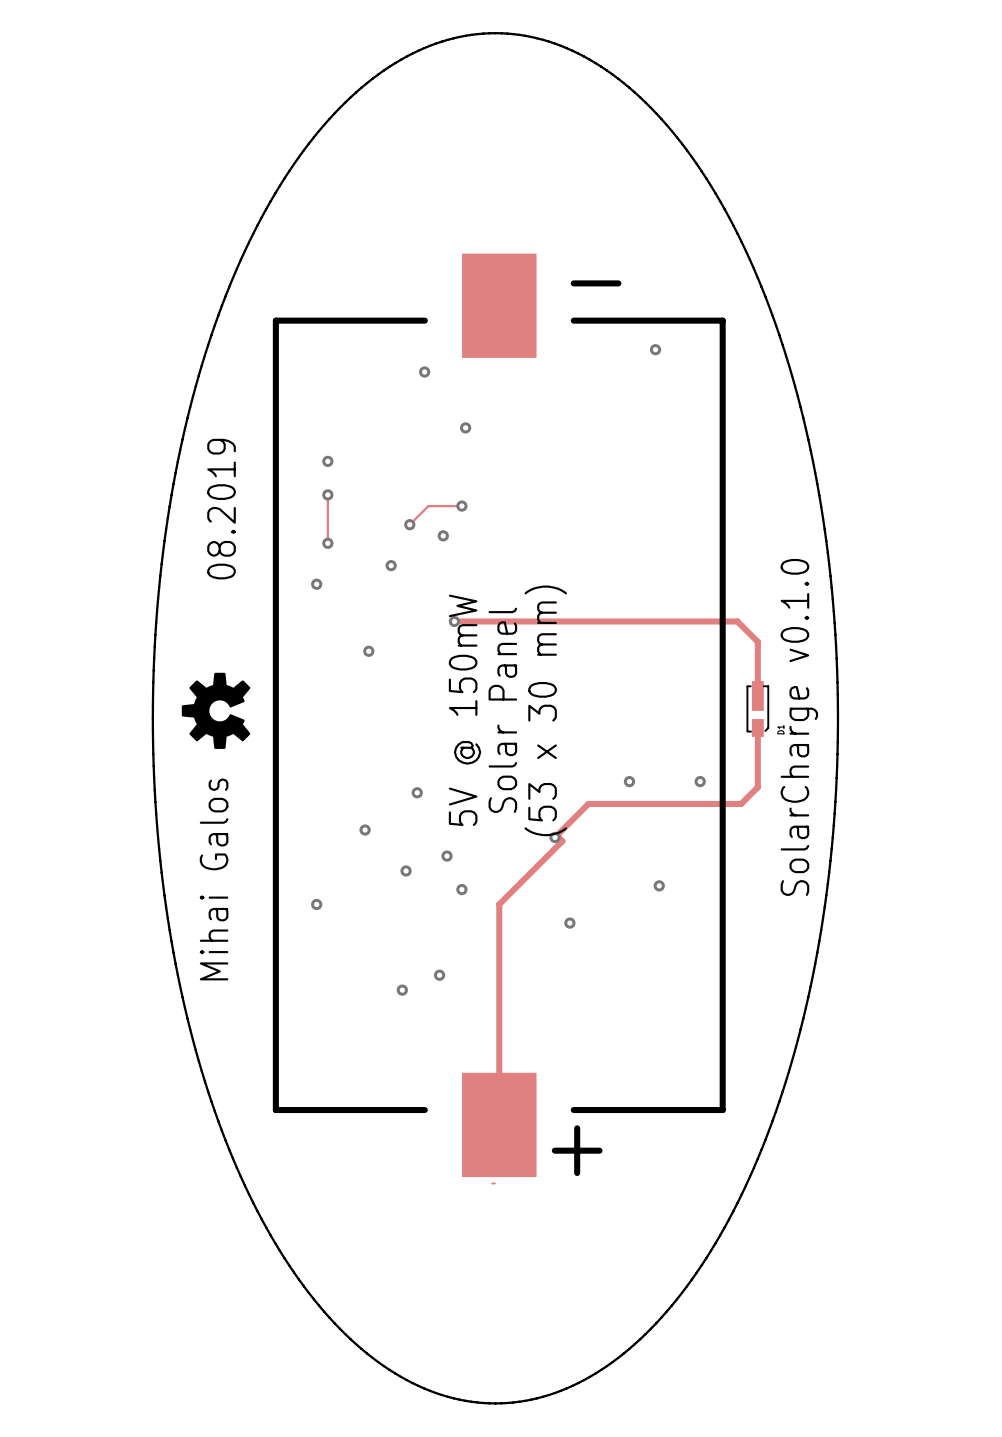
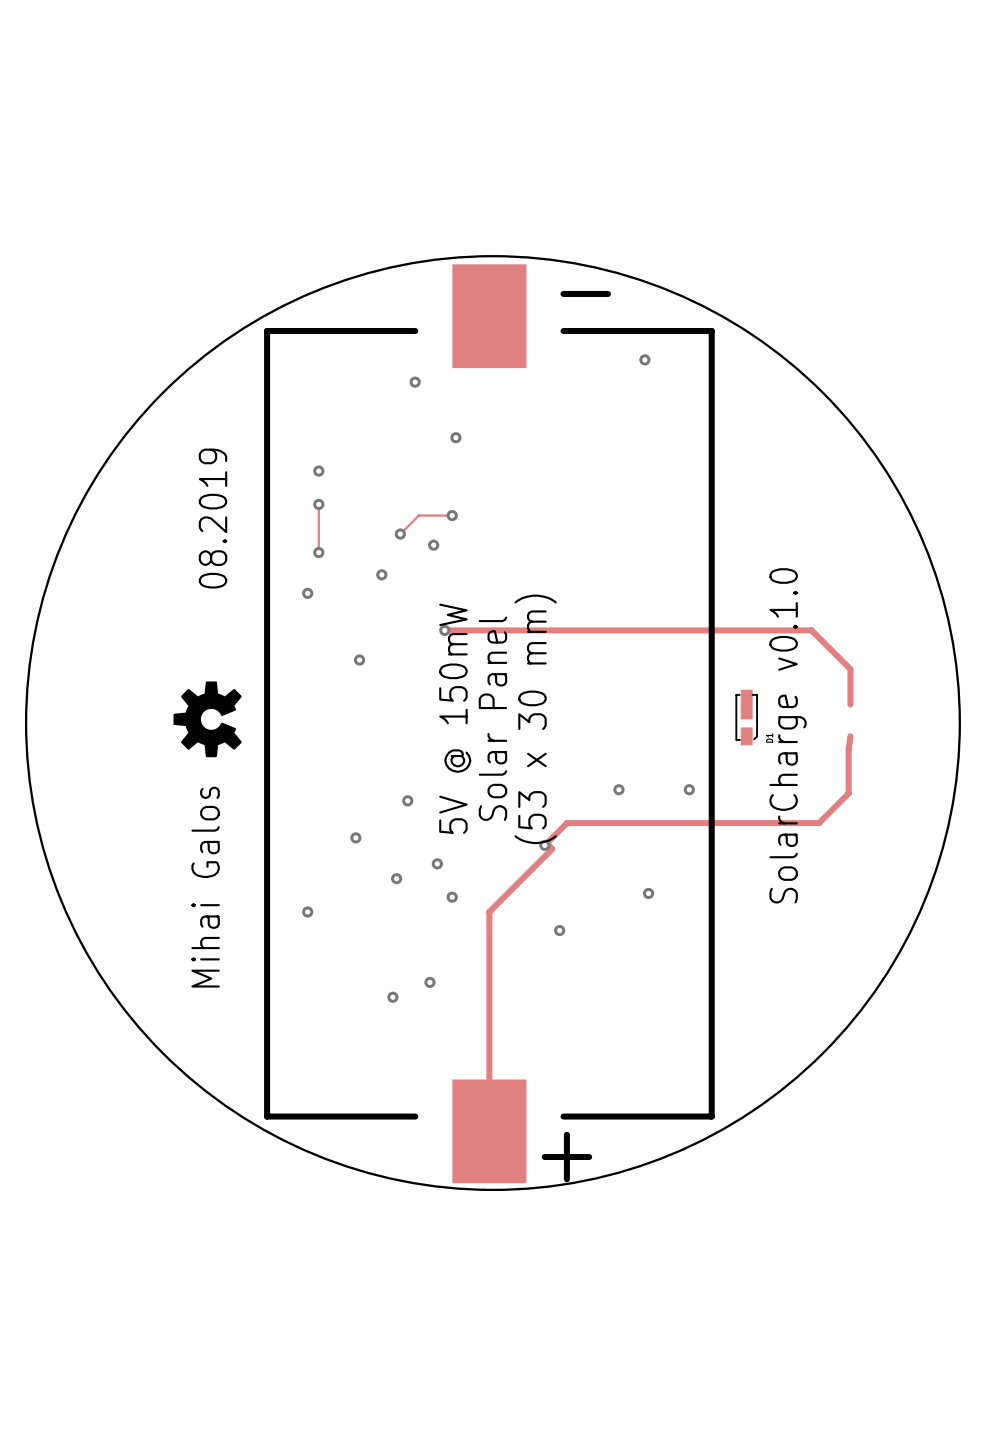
board edge: (495, 33) (525, 35) (560, 45) (595, 63) (623, 83) (650, 107) (681, 143) (710, 185) (737, 233) (761, 287) (779, 335) (795, 386) (810, 450) (821, 506) (830, 575) (836, 646) (837, 718) (836, 789) (830, 860) (821, 930) (810, 986) (795, 1050) (779, 1101) (761, 1149) (737, 1202) (710, 1250) (681, 1292) (650, 1328) (623, 1353) (595, 1373) (560, 1390) (525, 1400) (495, 1403) (465, 1400) (430, 1390) (395, 1373) (367, 1353) (339, 1328) (308, 1292) (279, 1250) (253, 1202) (229, 1149) (211, 1101) (195, 1050) (180, 986) (169, 930) (160, 860) (154, 789) (152, 718) (154, 646) (160, 575) (169, 506) (180, 450) (195, 386) (211, 335) (229, 287) (253, 233) (279, 185) (308, 143) (339, 107) (367, 83) (395, 63) (430, 45) (465, 35) (495, 33) -> none
round board edge: none -> [24, 255, 961, 1192]
track: (737, 621) (757, 641) (757, 695) -> (726, 630) (811, 630) (850, 669) (850, 704)
track: (757, 727) (757, 787) (741, 803) (588, 803) (577, 815) -> (850, 736) (848, 793) (819, 823) (567, 823)

